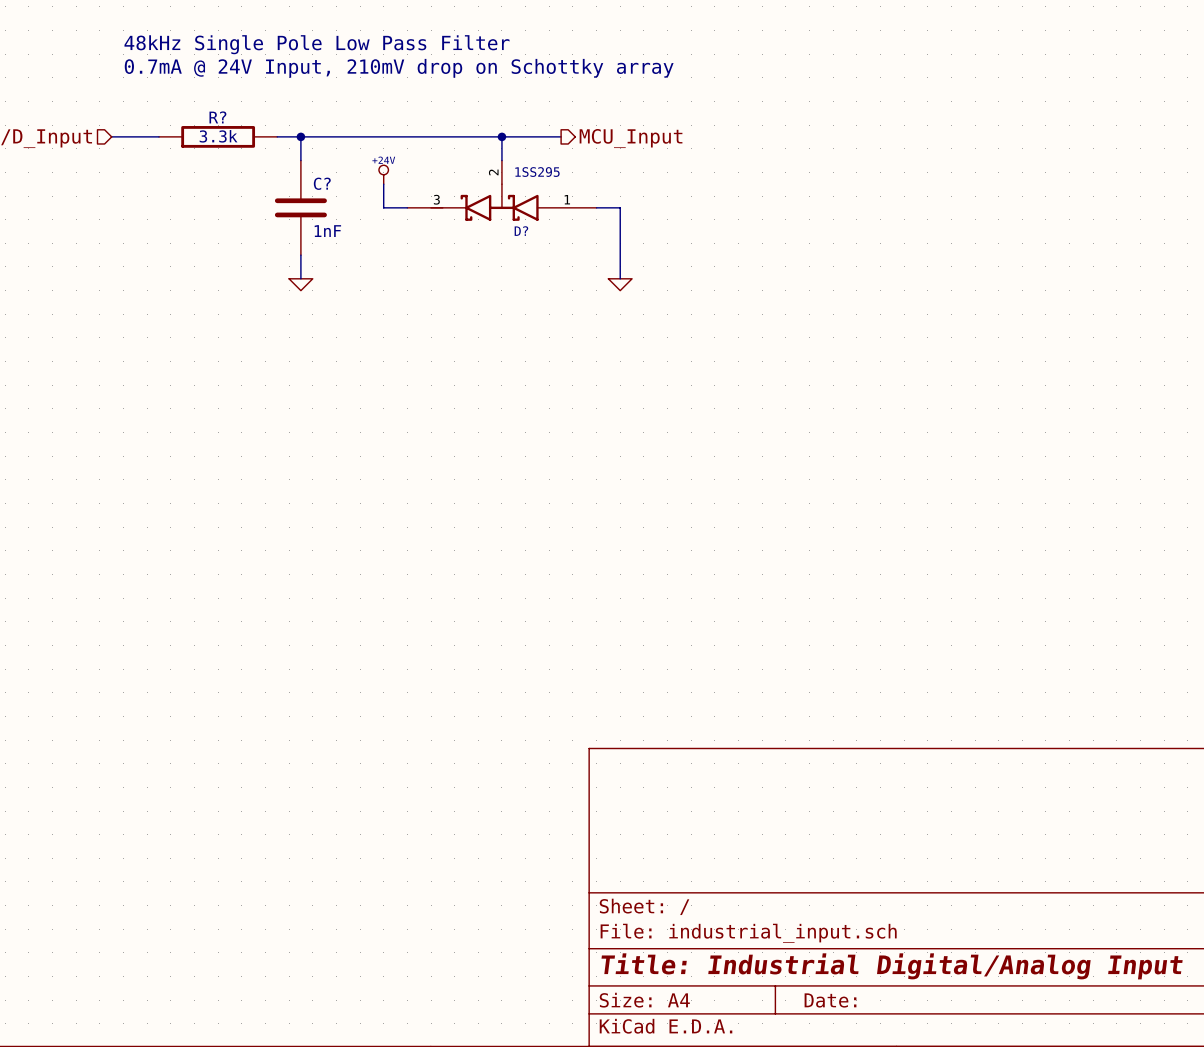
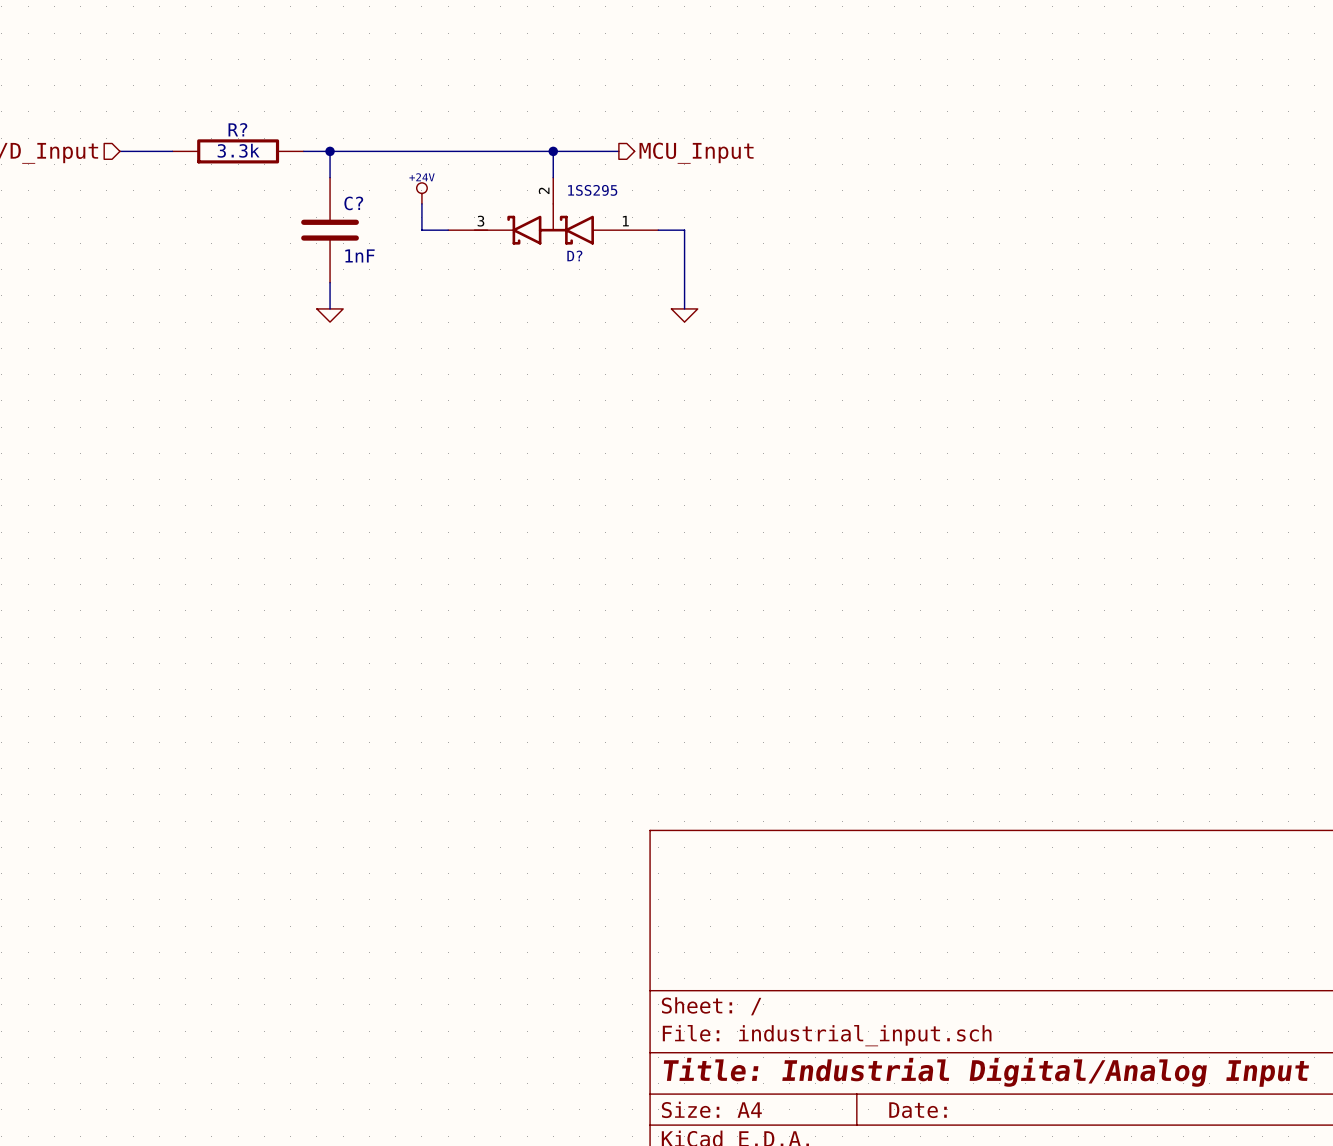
text: 48kHz Single Pole Low Pass Filter (317, 44) -> none
text: 0.7mA @ 24V Input, 210mV drop on Schottky array (399, 68) -> none

